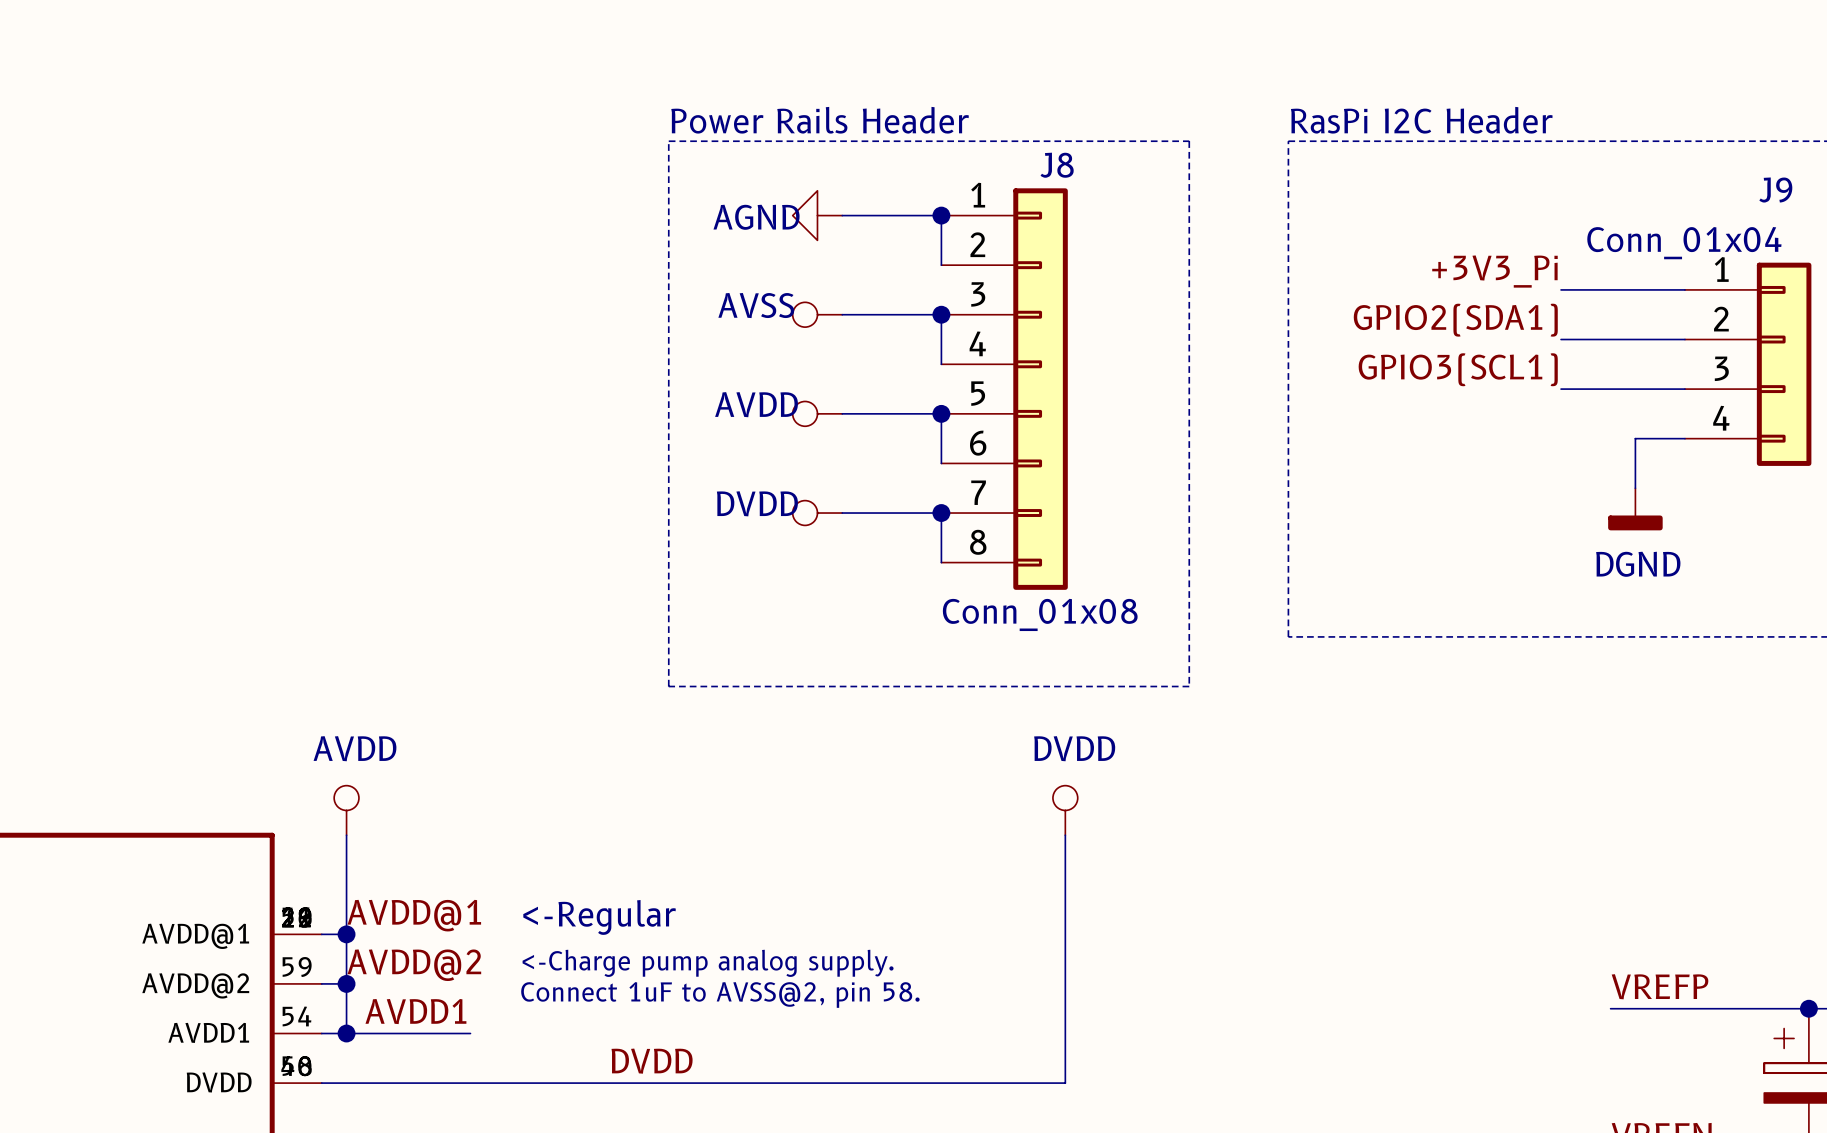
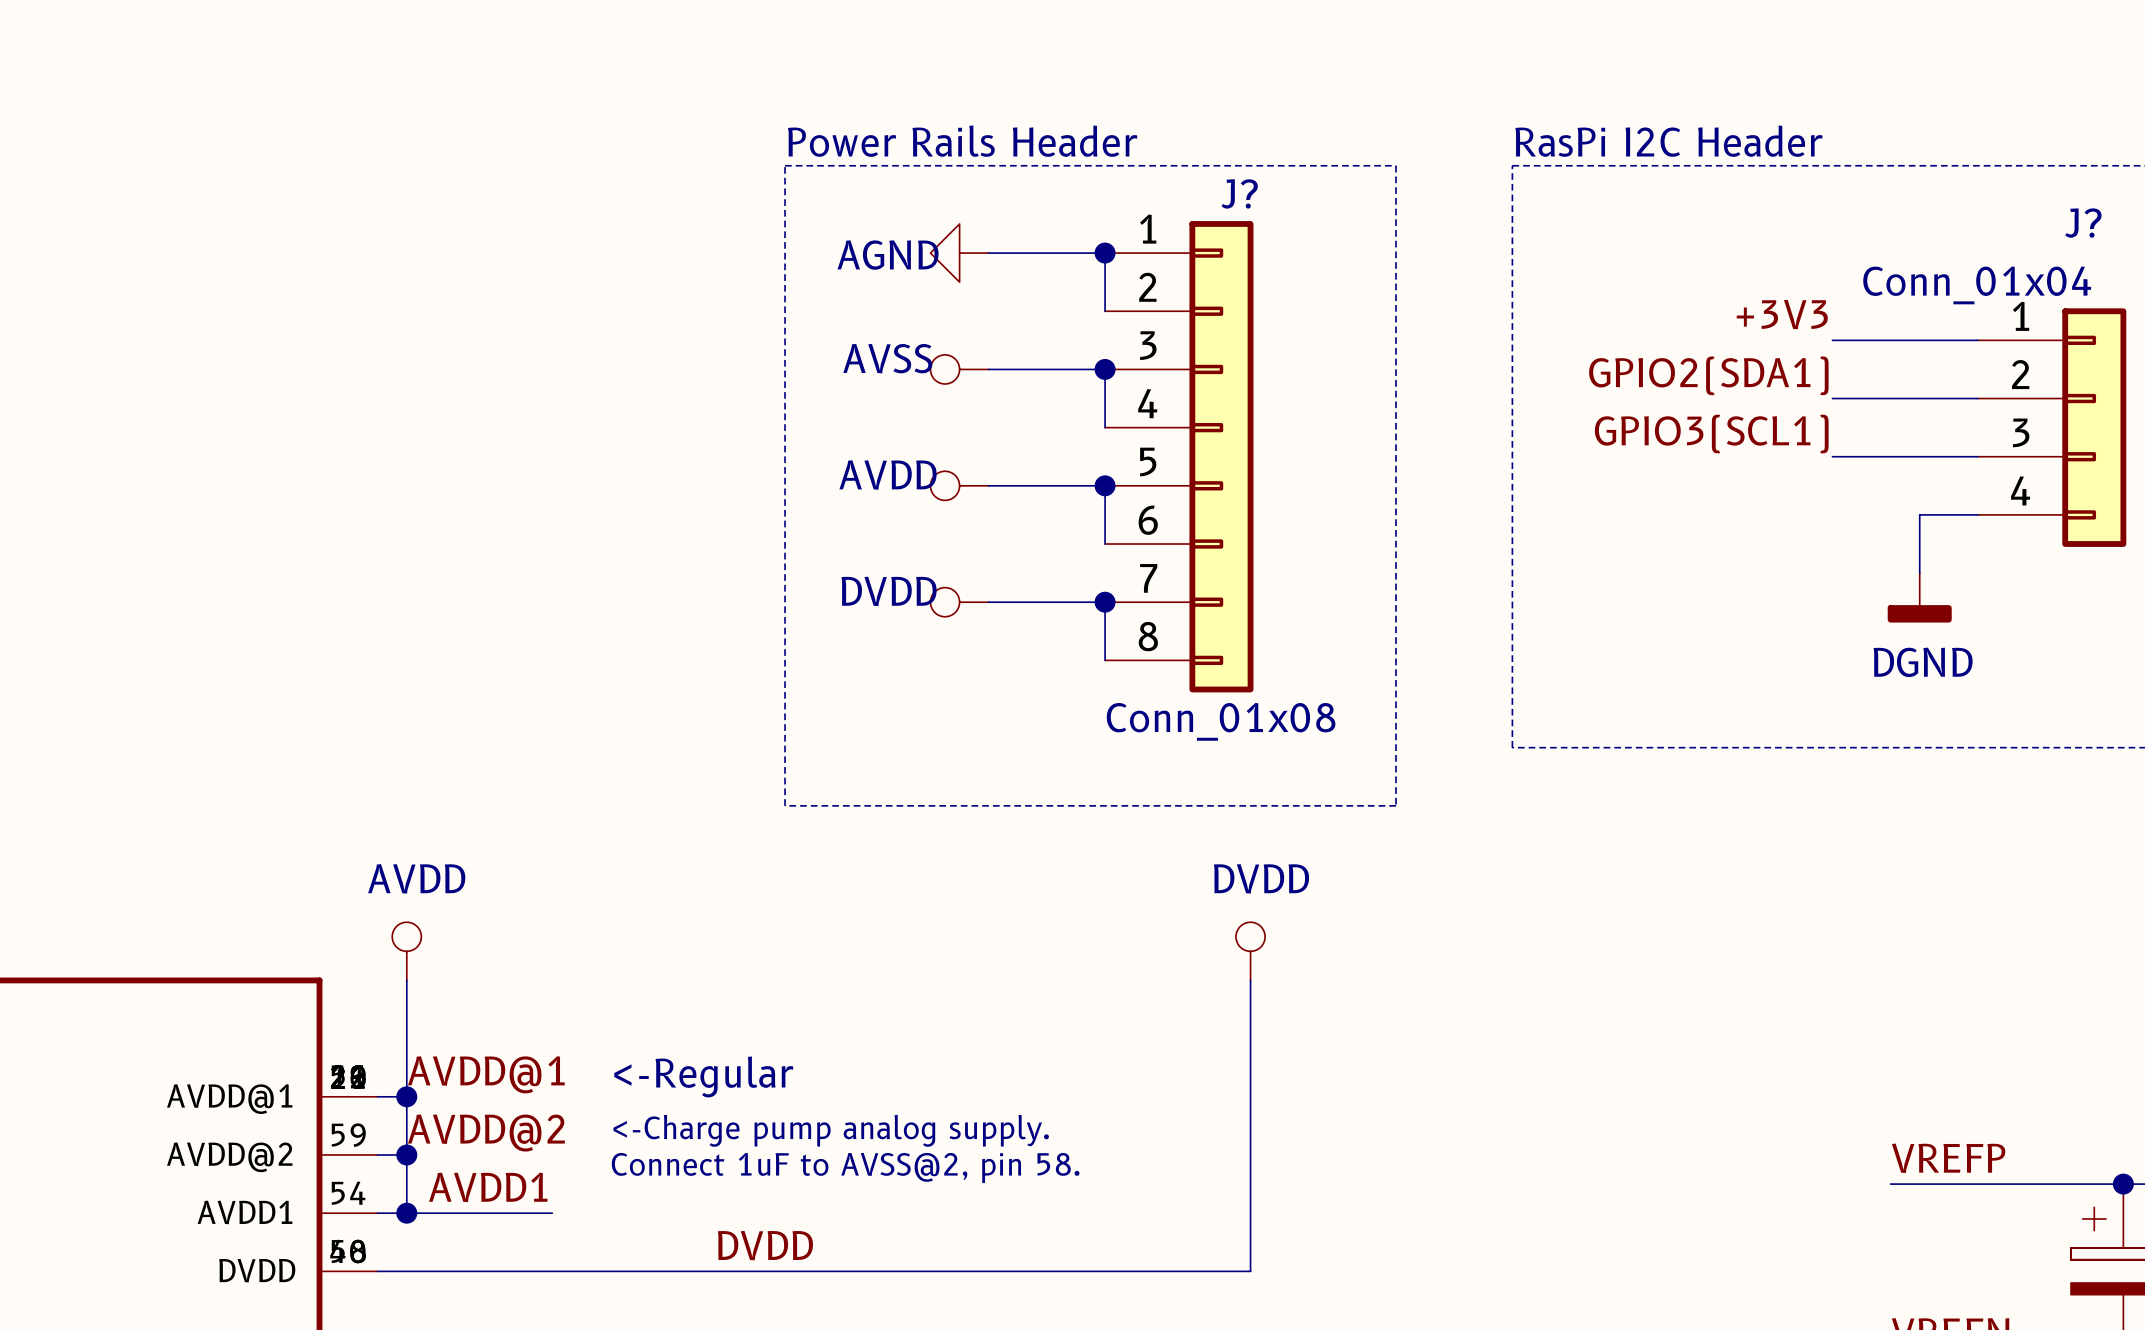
J8 name: J8 (1057, 165) -> J? (1239, 193)
J9 name: J9 (1775, 190) -> J? (2083, 223)
label: +3V3_Pi (1494, 271) -> +3V3 (1782, 314)

